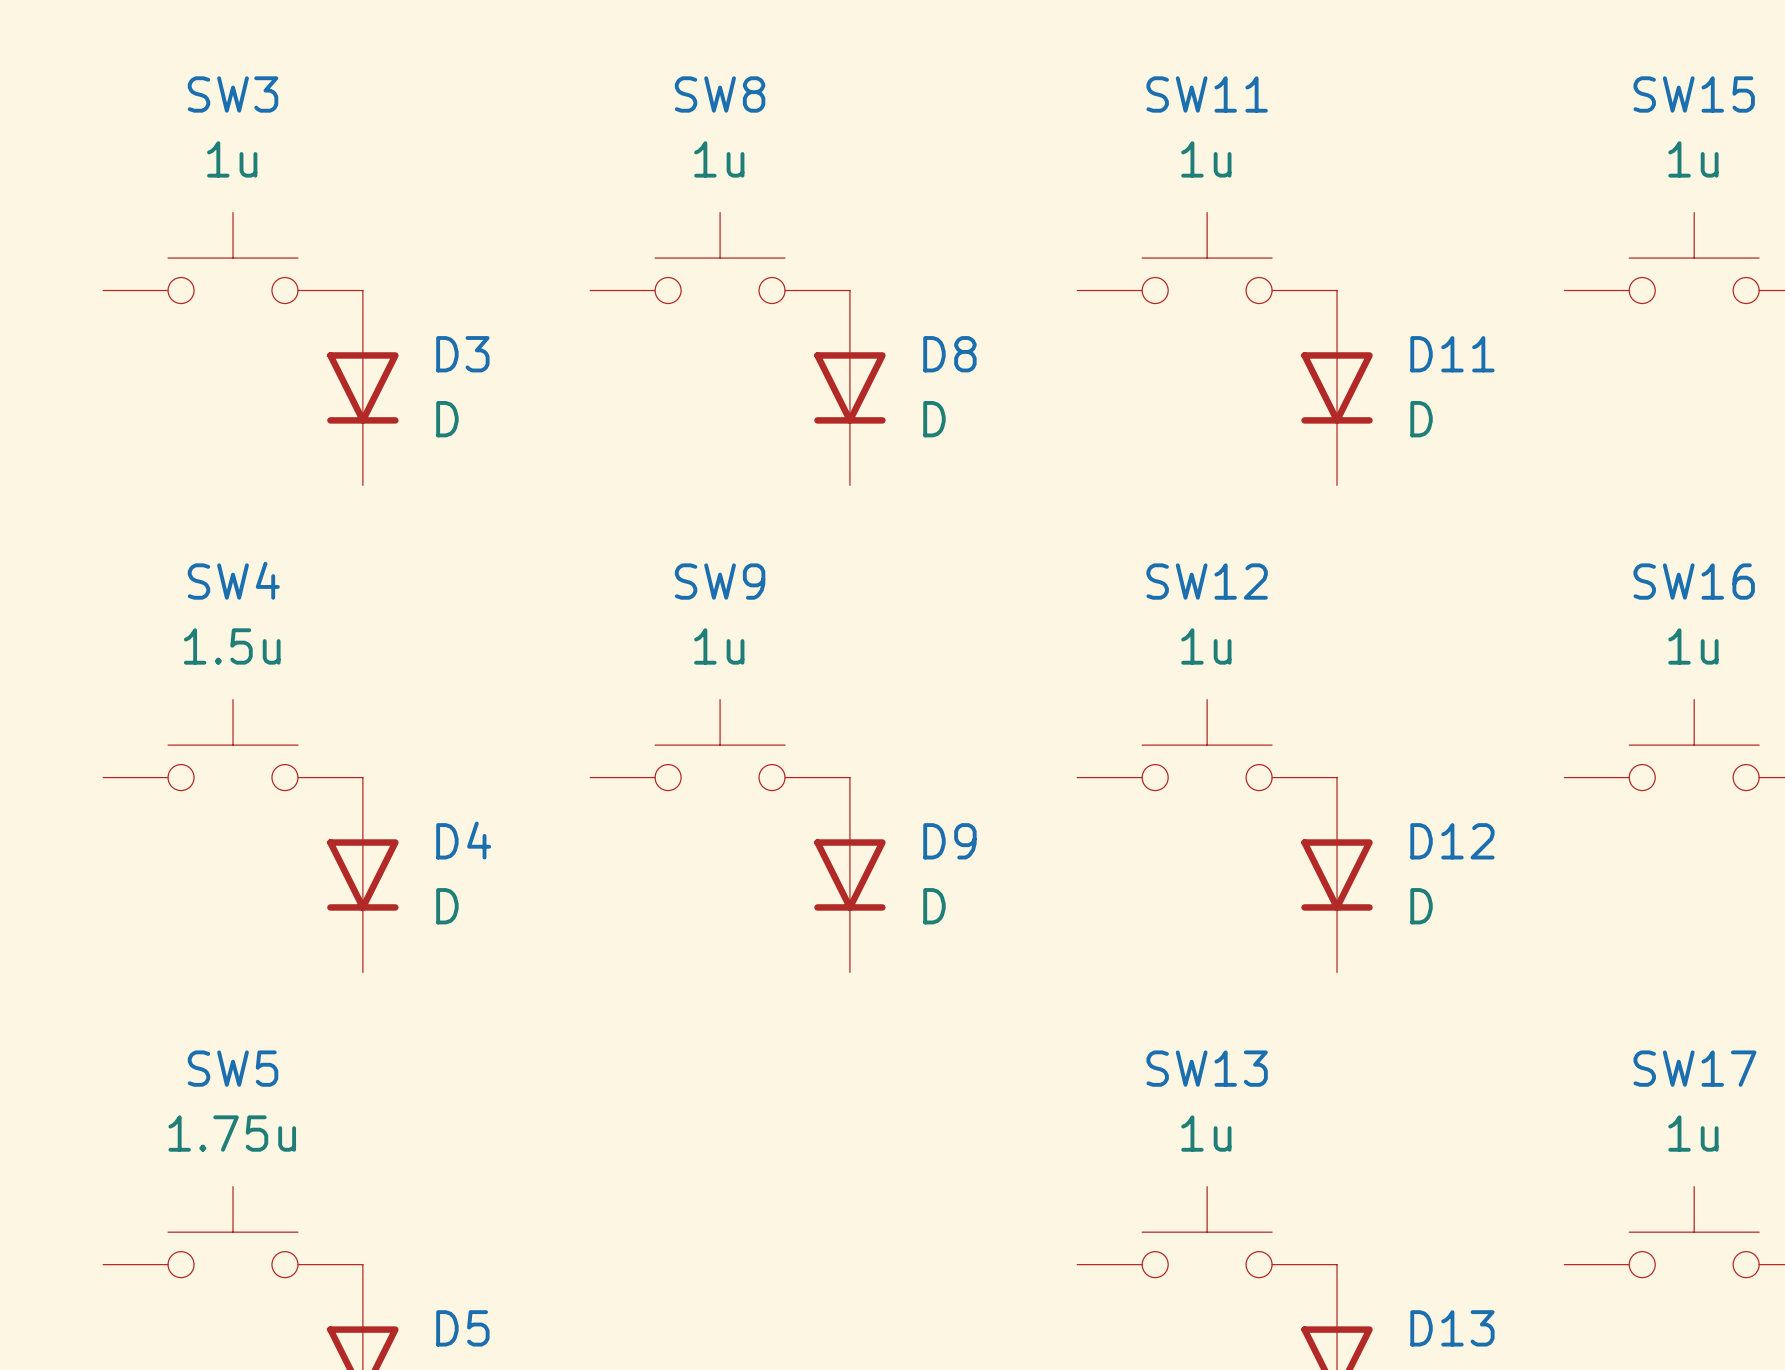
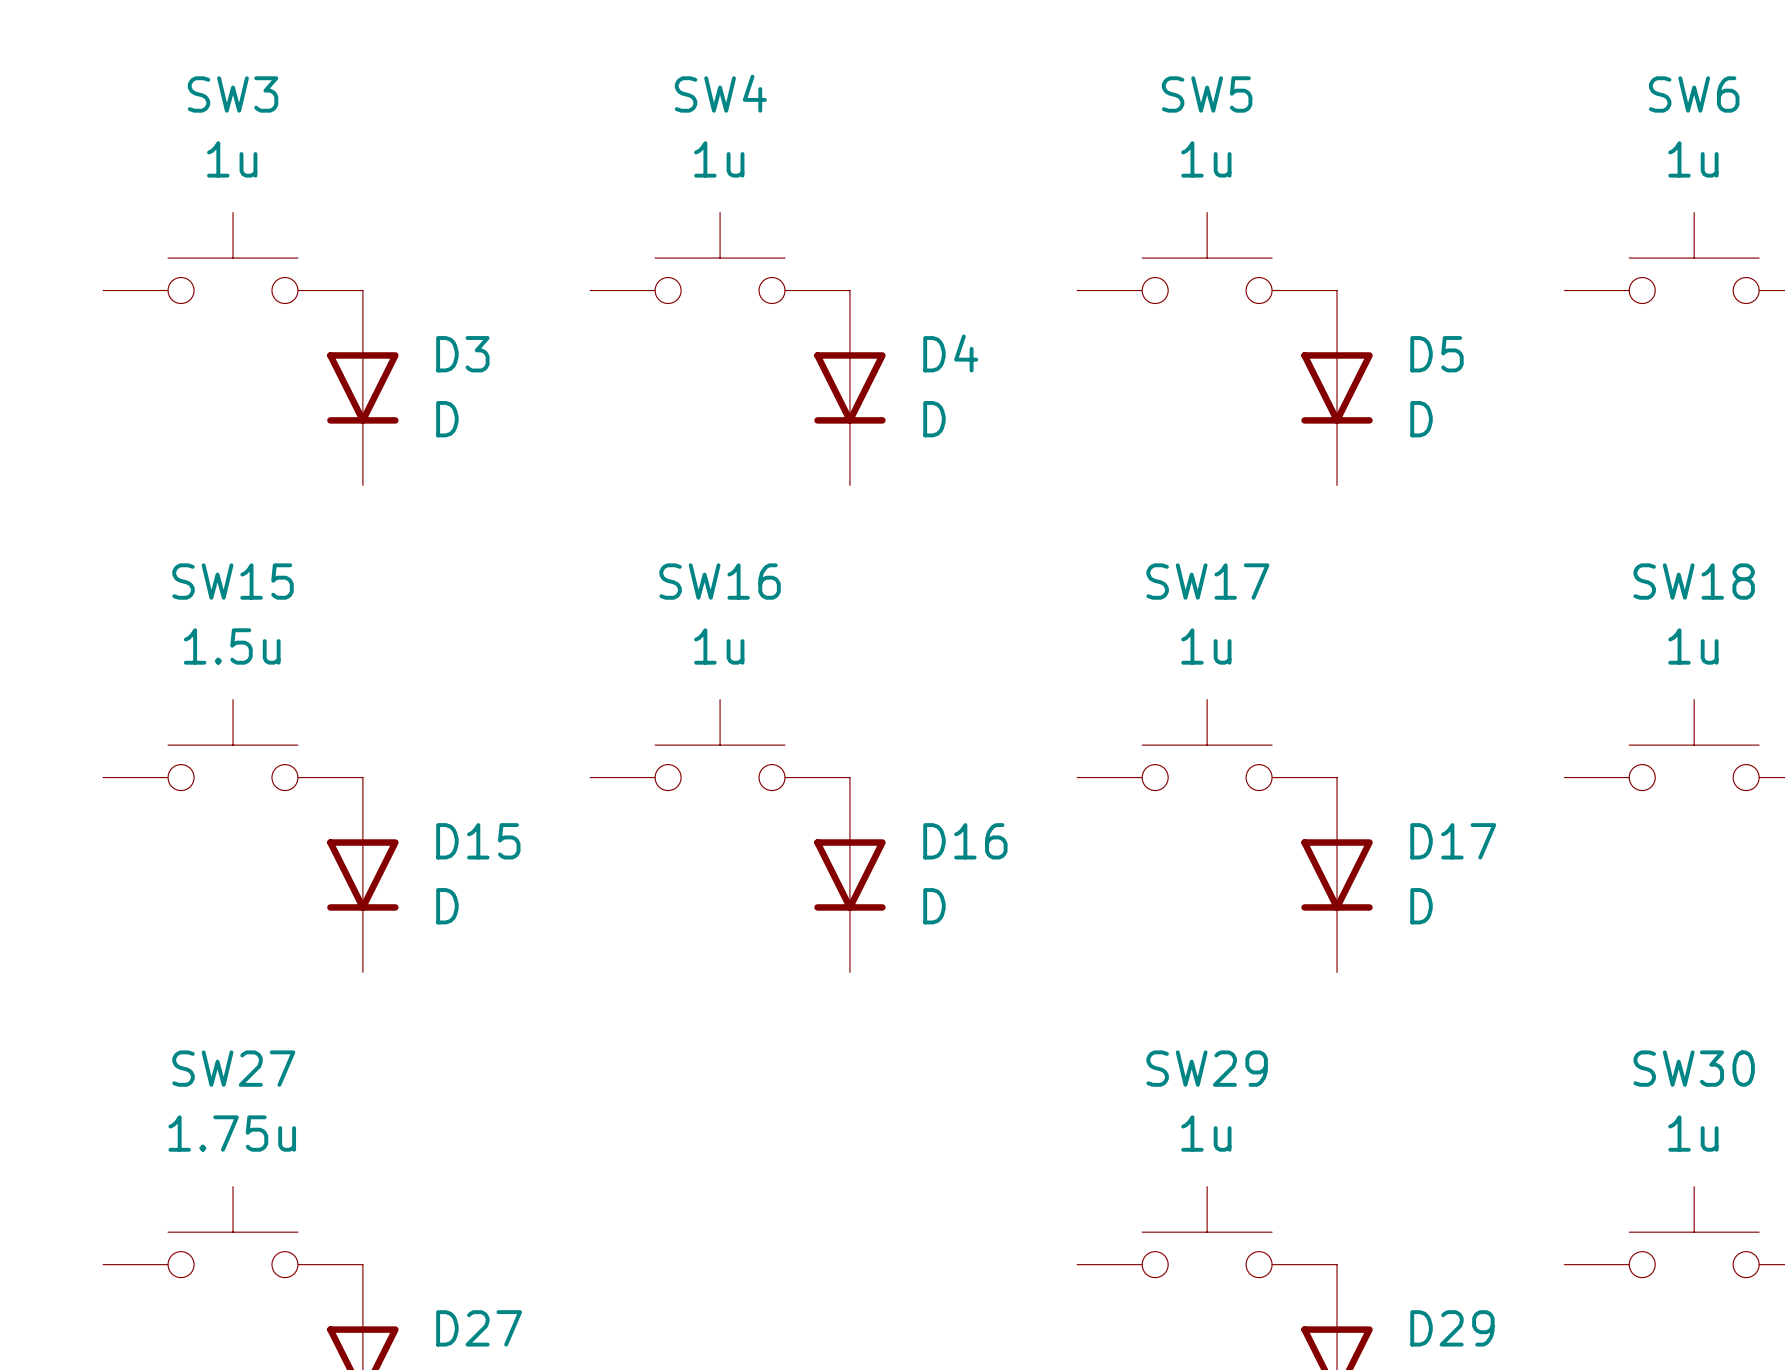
SW8 name: SW8 (720, 94) -> SW4 (720, 93)
SW11 name: SW11 (1207, 94) -> SW5 (1207, 94)
SW15 name: SW15 (1694, 94) -> SW6 (1694, 94)
D8 name: D8 (949, 354) -> D4 (950, 353)
D11 name: D11 (1452, 354) -> D5 (1436, 354)
SW4 name: SW4 (233, 580) -> SW15 (233, 581)
SW9 name: SW9 (720, 581) -> SW16 (720, 581)
SW12 name: SW12 (1207, 581) -> SW17 (1207, 581)
SW16 name: SW16 (1694, 581) -> SW18 (1694, 581)
D4 name: D4 (463, 840) -> D15 (478, 841)
D9 name: D9 (949, 841) -> D16 (965, 841)
D12 name: D12 (1452, 841) -> D17 (1453, 841)
SW5 name: SW5 (233, 1068) -> SW27 (233, 1068)
SW13 name: SW13 (1207, 1068) -> SW29 (1207, 1068)
SW17 name: SW17 (1694, 1068) -> SW30 (1694, 1068)
D5 name: D5 (462, 1328) -> D27 (479, 1328)
D13 name: D13 (1452, 1328) -> D29 (1452, 1328)

